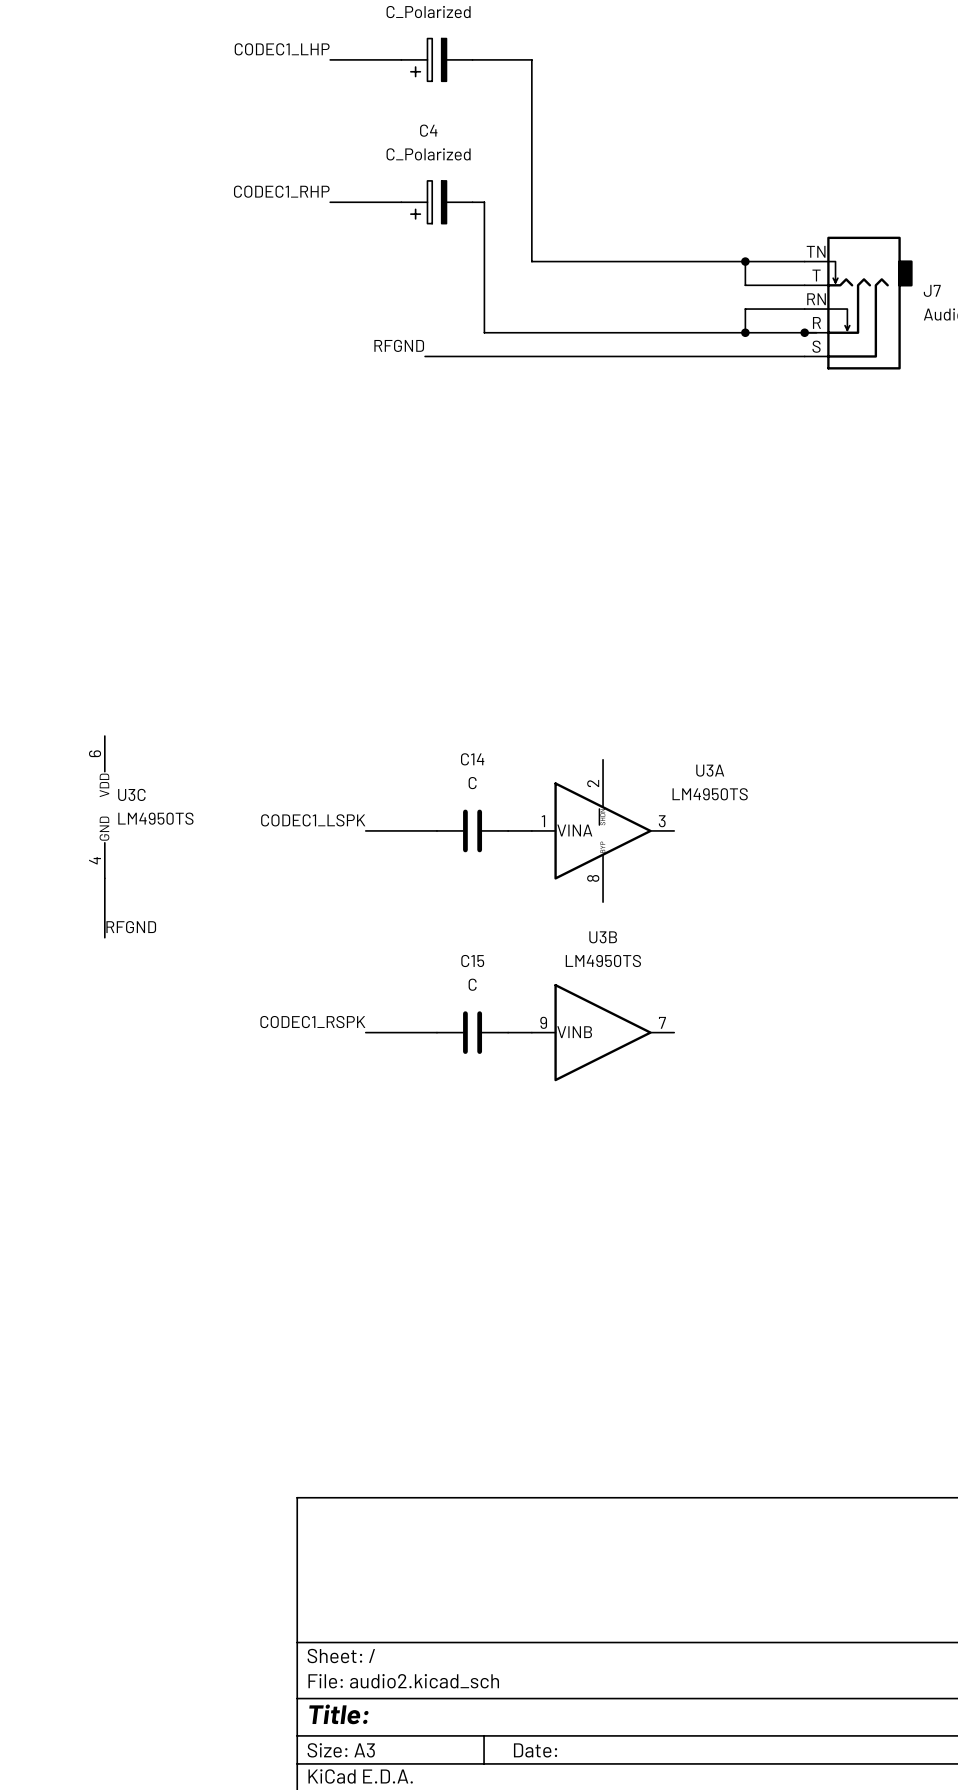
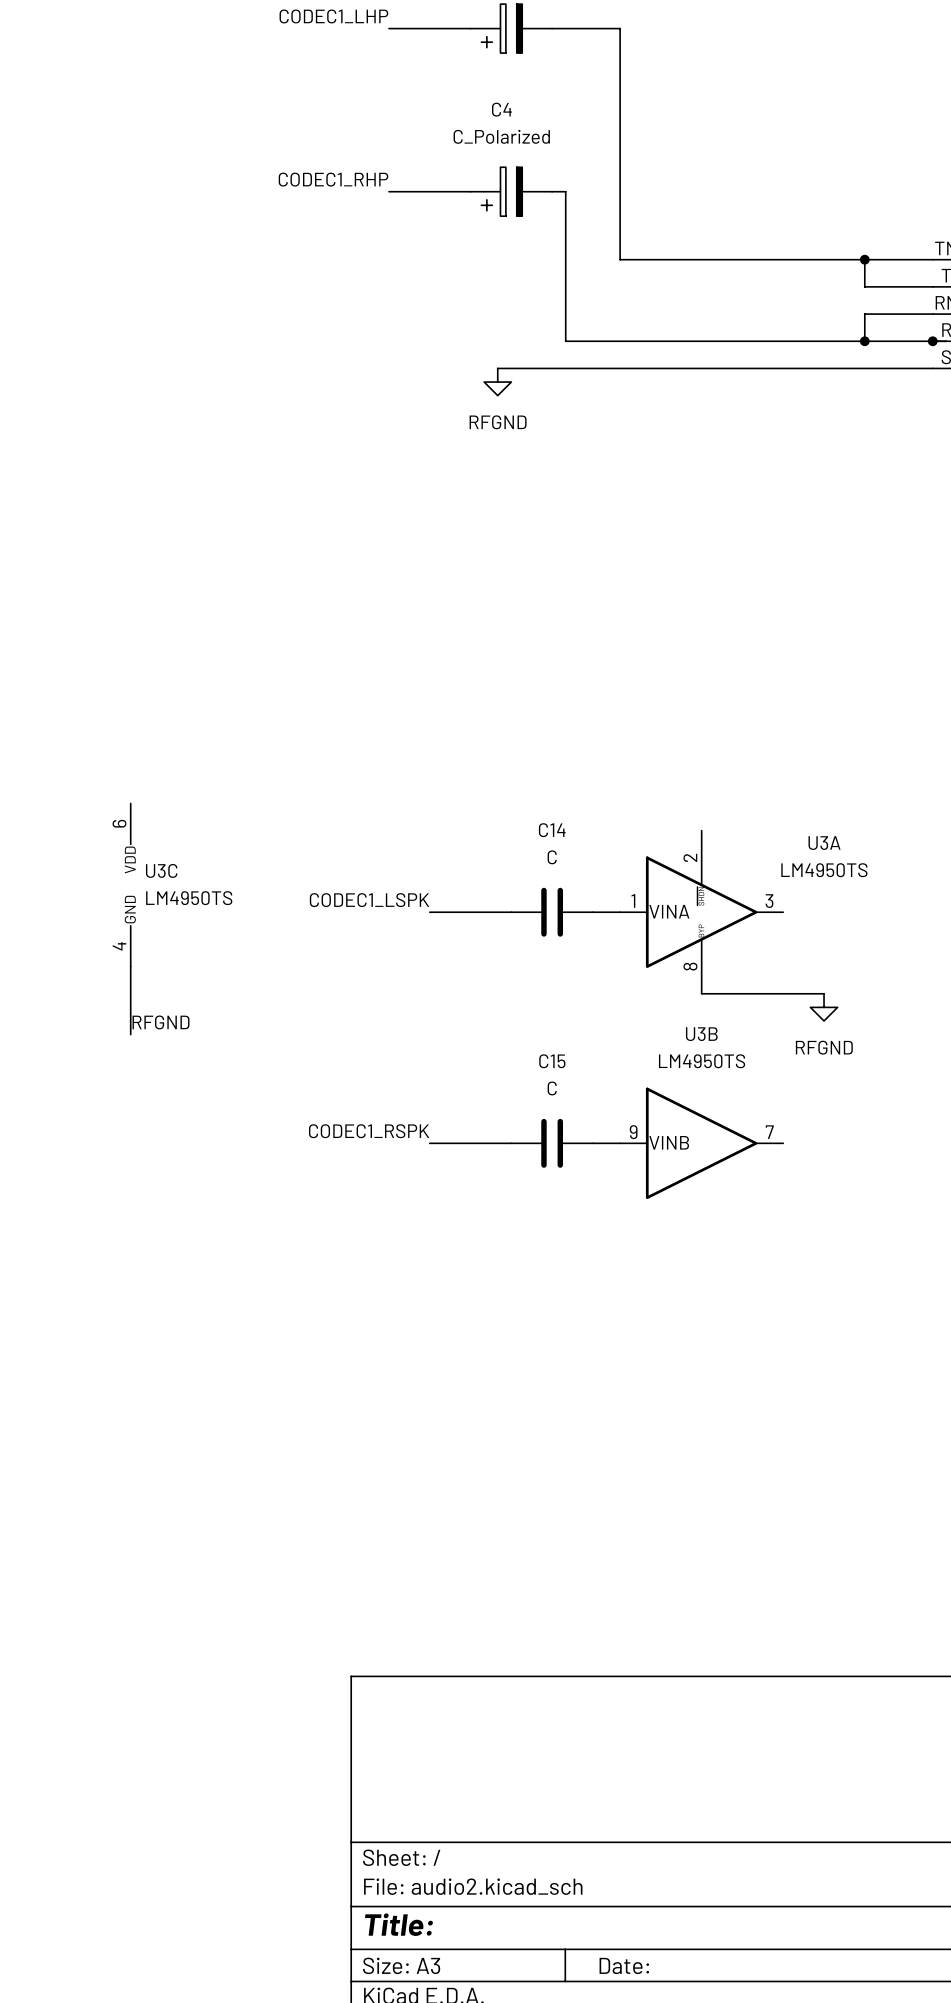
label: RFGND (399, 345) -> none
power symbol: none -> RFGND (497, 382)
wire: none -> (701, 993) (824, 993)
power symbol: none -> RFGND (824, 1007)

